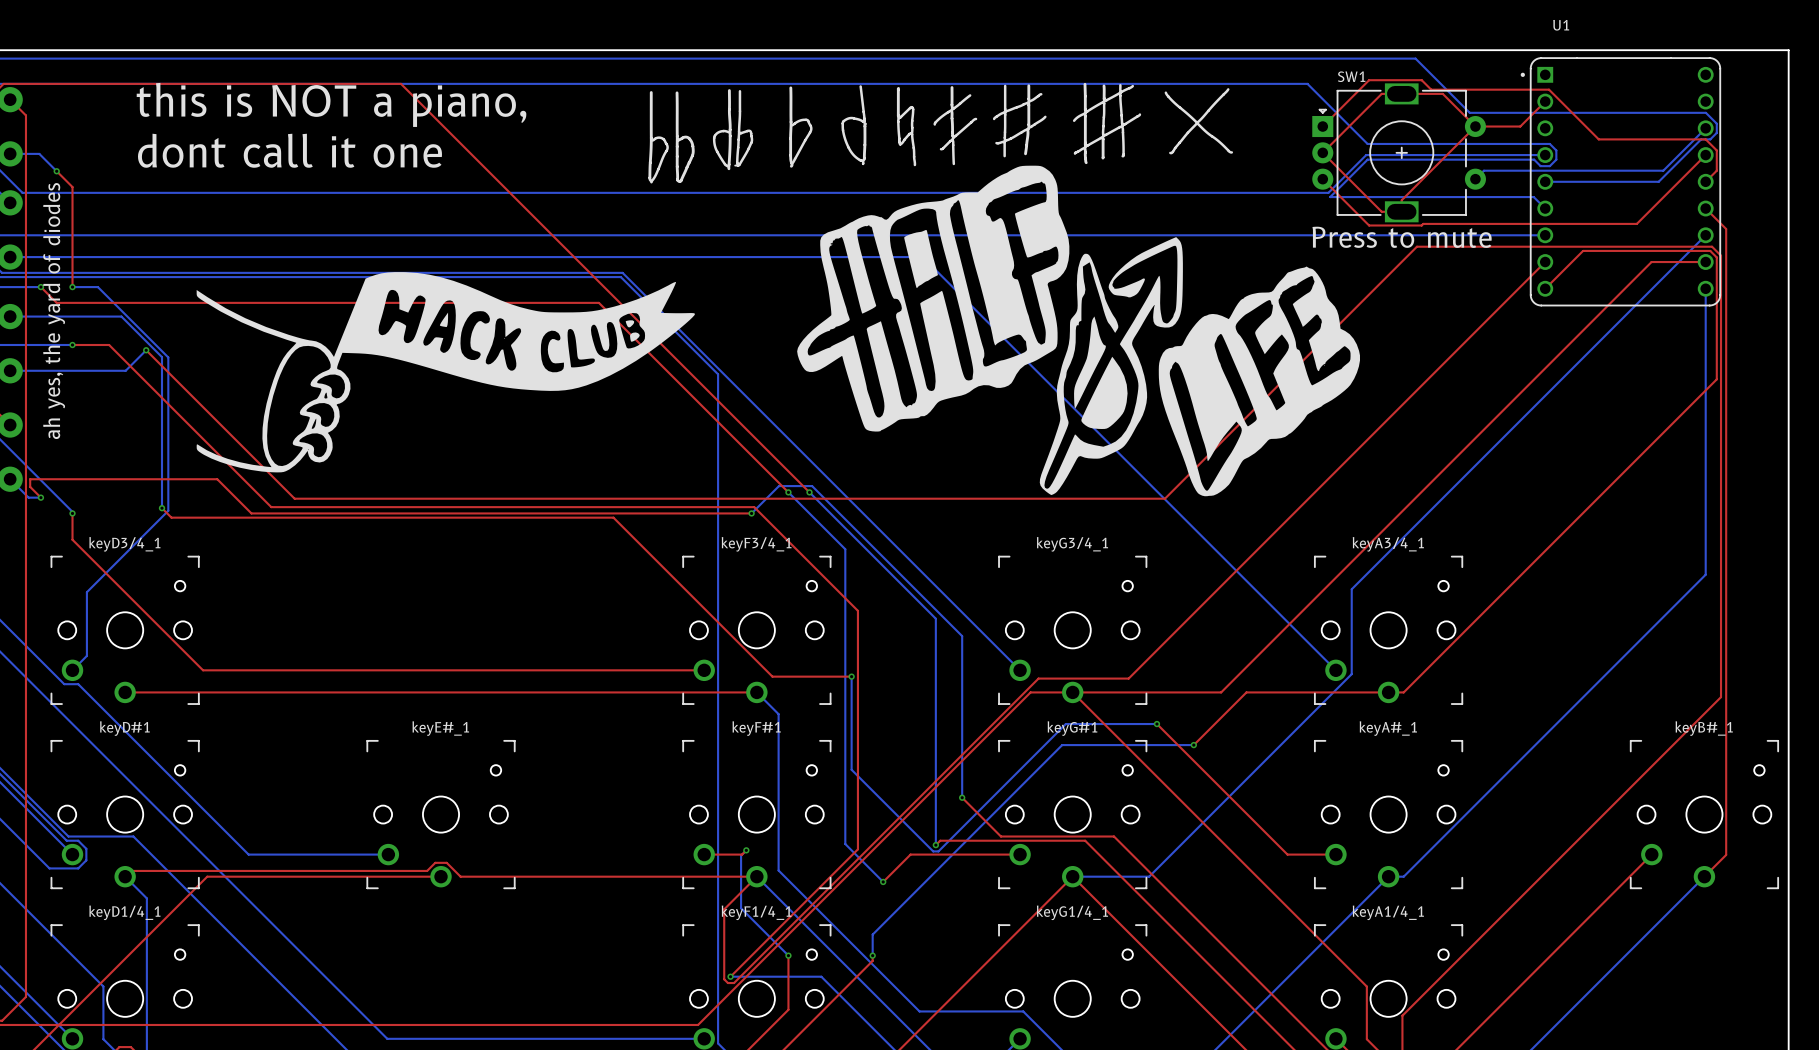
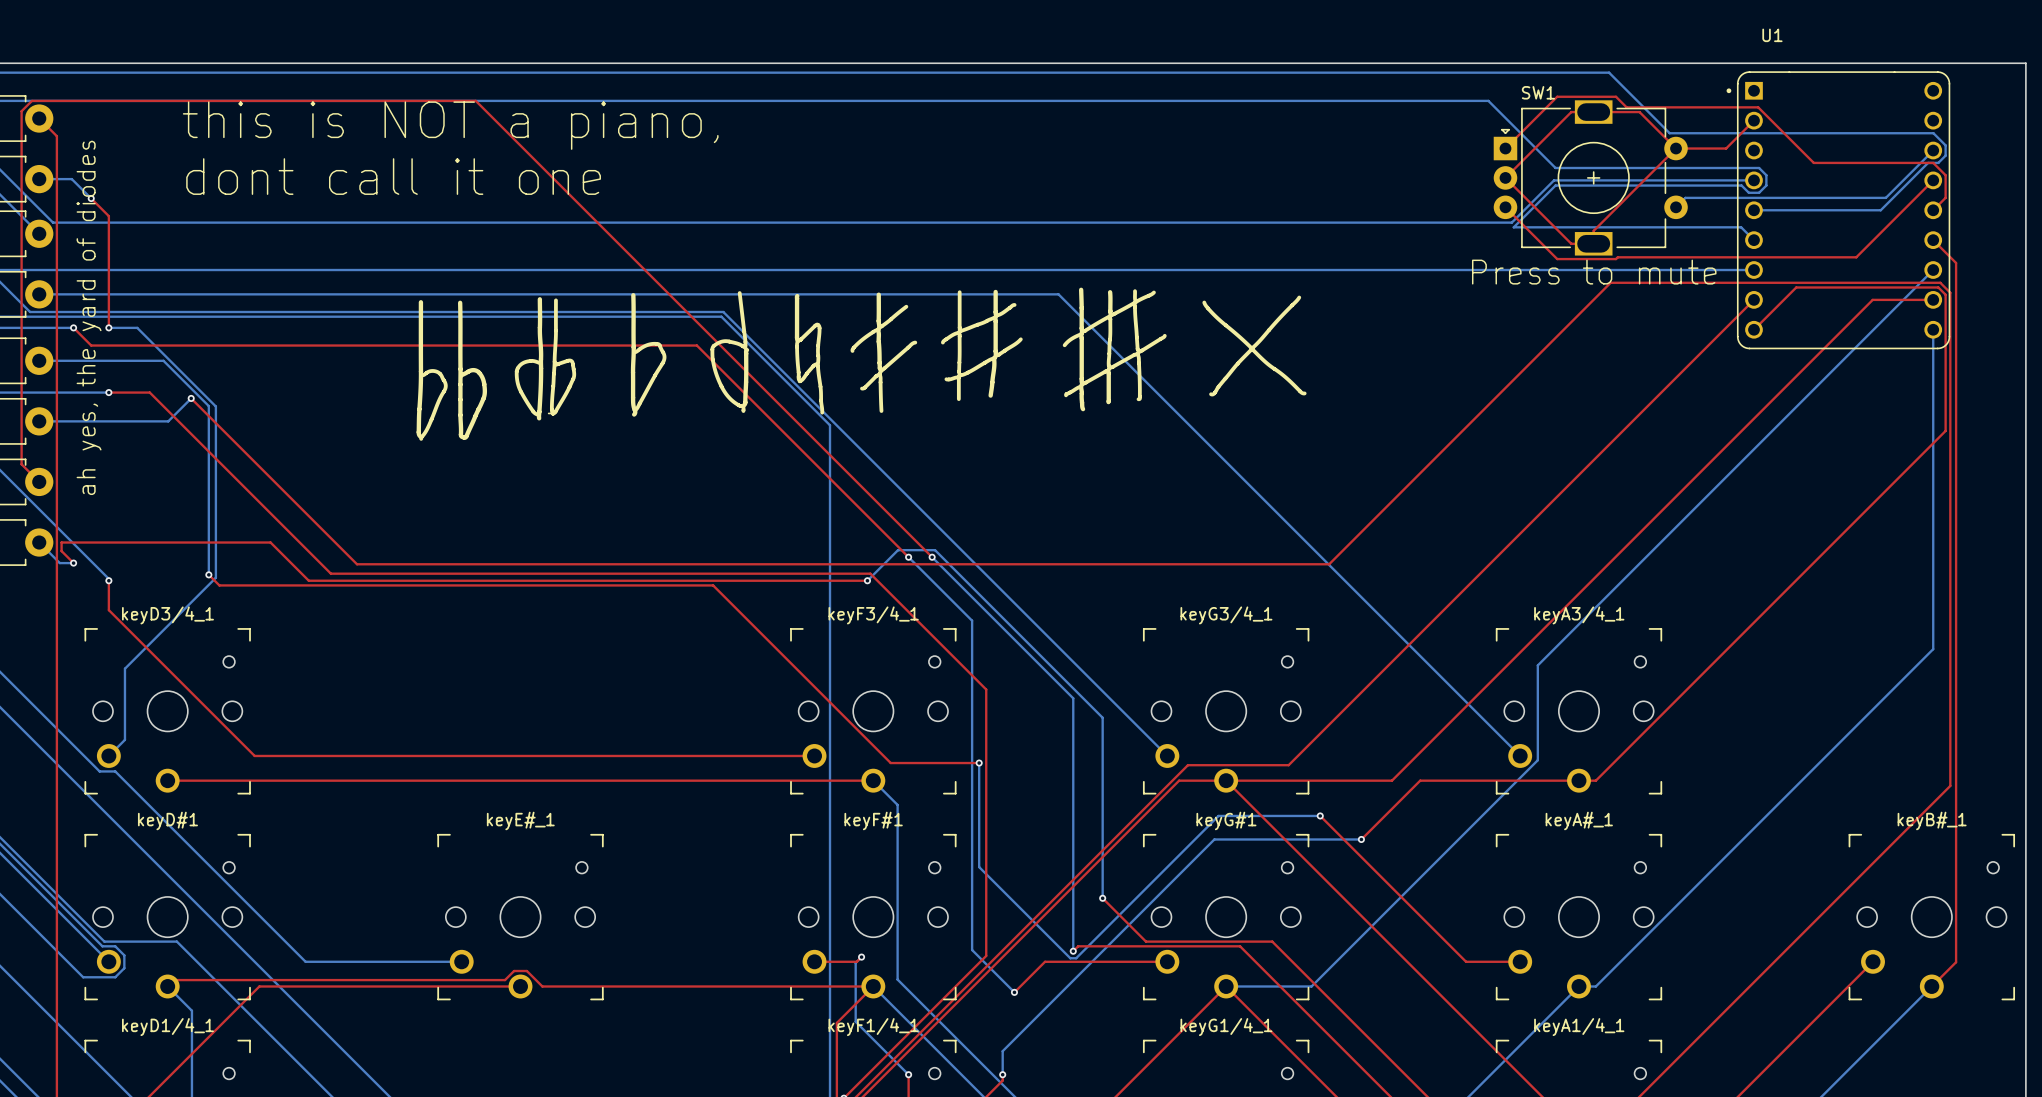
line: (1084, 84) (1086, 162) -> none
line: (1005, 85) (1005, 111) -> none
line: (1028, 85) (1029, 101) -> none
line: (1104, 85) (1104, 100) -> none
line: (1120, 85) (1120, 92) -> (1135, 291) (1135, 301)
line: (860, 86) (865, 123) -> none
line: (1132, 86) (1086, 111) -> none
line: (790, 87) (791, 166) -> none
line: (952, 87) (953, 137) -> none
line: (898, 88) (898, 118) -> none
line: (1228, 89) (1197, 122) -> none
line: (729, 90) (728, 168) -> none
line: (739, 91) (737, 165) (751, 140) (750, 131) (739, 133) -> none
line: (651, 92) (649, 178) (651, 181) -> none
line: (677, 92) (677, 179) (680, 181) (693, 149) (691, 142) (688, 137) (684, 137) (677, 140) -> none
line: (1165, 92) (1197, 123) (1170, 152) -> none
line: (1119, 93) (1122, 125) (1103, 135) -> none
line: (1041, 94) (1027, 102) (1004, 111) (1004, 156) -> none
line: (970, 95) (952, 108) -> none
line: (1028, 102) (1028, 127) (1025, 153) -> none
line: (1103, 102) (1103, 136) (1086, 146) -> none
line: (951, 110) (940, 117) (934, 124) -> none
line: (1004, 112) (994, 118) -> none
line: (1084, 113) (1074, 120) -> none
line: (1139, 114) (1122, 125) -> none
line: (1045, 116) (1029, 127) -> none
line: (976, 118) (941, 149) -> none
line: (864, 121) (850, 118) (842, 123) (843, 134) (848, 147) (854, 156) (862, 161) (863, 163) -> none
line: (1197, 123) (1231, 152) -> none
line: (865, 124) (863, 160) -> none
line: (791, 125) (800, 120) (806, 119) (811, 128) (792, 163) -> none
line: (1121, 126) (1122, 156) -> none
line: (1027, 129) (1005, 140) -> none
line: (729, 132) (719, 131) (714, 138) (716, 150) (728, 166) -> none
line: (911, 133) (900, 144) (898, 119) (911, 107) (914, 165) -> none
line: (1102, 137) (1102, 158) -> none
line: (952, 139) (953, 163) -> none
line: (651, 140) (661, 138) (667, 147) (651, 182) -> none
line: (1004, 141) (996, 143) -> (958, 377) (946, 379)
line: (1084, 147) (1075, 153) -> (1080, 386) (1066, 395)
line: (735, 165) (737, 165) -> none
drawing: [797, 165, 1361, 497] -> none
line: none -> (1081, 289) (1081, 387) (1083, 409)
line: none -> (995, 291) (996, 315)
line: none -> (739, 293) (745, 347) (747, 350)
line: none -> (959, 292) (960, 330)
line: none -> (1110, 292) (1111, 314)
line: none -> (1153, 292) (1082, 331)
line: none -> (633, 295) (634, 414)
line: none -> (878, 294) (877, 330) (881, 370)
line: none -> (797, 296) (797, 341)
line: none -> (1299, 297) (1252, 348)
line: none -> (539, 299) (541, 373) (539, 418)
line: none -> (555, 300) (552, 413) (566, 393) (574, 375) (571, 360) (555, 364)
line: none -> (420, 302) (418, 432) (421, 437)
line: none -> (460, 302) (460, 434) (464, 437) (483, 398) (484, 389) (482, 378) (477, 371) (471, 370) (461, 375)
line: none -> (1204, 302) (1215, 316) (1252, 348) (1214, 393) (1211, 394)
line: none -> (1134, 303) (1138, 352) (1109, 368)
line: none -> (1014, 304) (993, 318) (959, 331) (958, 399)
line: none -> (906, 306) (879, 326)
drawing: [196, 272, 695, 473] -> none
line: none -> (1109, 317) (1108, 369) (1082, 383)
line: none -> (995, 317) (995, 354) (990, 395)
line: none -> (877, 330) (861, 340) (852, 350)
line: none -> (958, 332) (942, 342)
line: none -> (1080, 334) (1064, 345)
line: none -> (1164, 335) (1138, 351)
line: none -> (1020, 339) (996, 355)
line: none -> (915, 342) (861, 388)
line: none -> (744, 346) (724, 341) (715, 344) (712, 349) (714, 366) (721, 386) (730, 399) (742, 406) (743, 411)
line: none -> (1252, 349) (1304, 393)
line: none -> (746, 350) (743, 405)
line: none -> (634, 352) (647, 345) (657, 344) (664, 357) (635, 410)
line: none -> (1137, 354) (1139, 382) (1138, 399)
line: none -> (993, 358) (960, 375)
line: none -> (539, 363) (532, 360) (525, 362) (519, 365) (516, 371) (520, 390) (533, 411) (538, 414)
line: none -> (817, 363) (799, 381) (797, 342) (817, 324) (819, 327) (817, 366) (822, 412)
line: none -> (1108, 370) (1108, 402)
line: none -> (879, 374) (881, 411)
line: none -> (421, 375) (429, 371) (437, 371) (441, 375) (445, 385) (421, 438)
line: none -> (548, 413) (552, 413)

